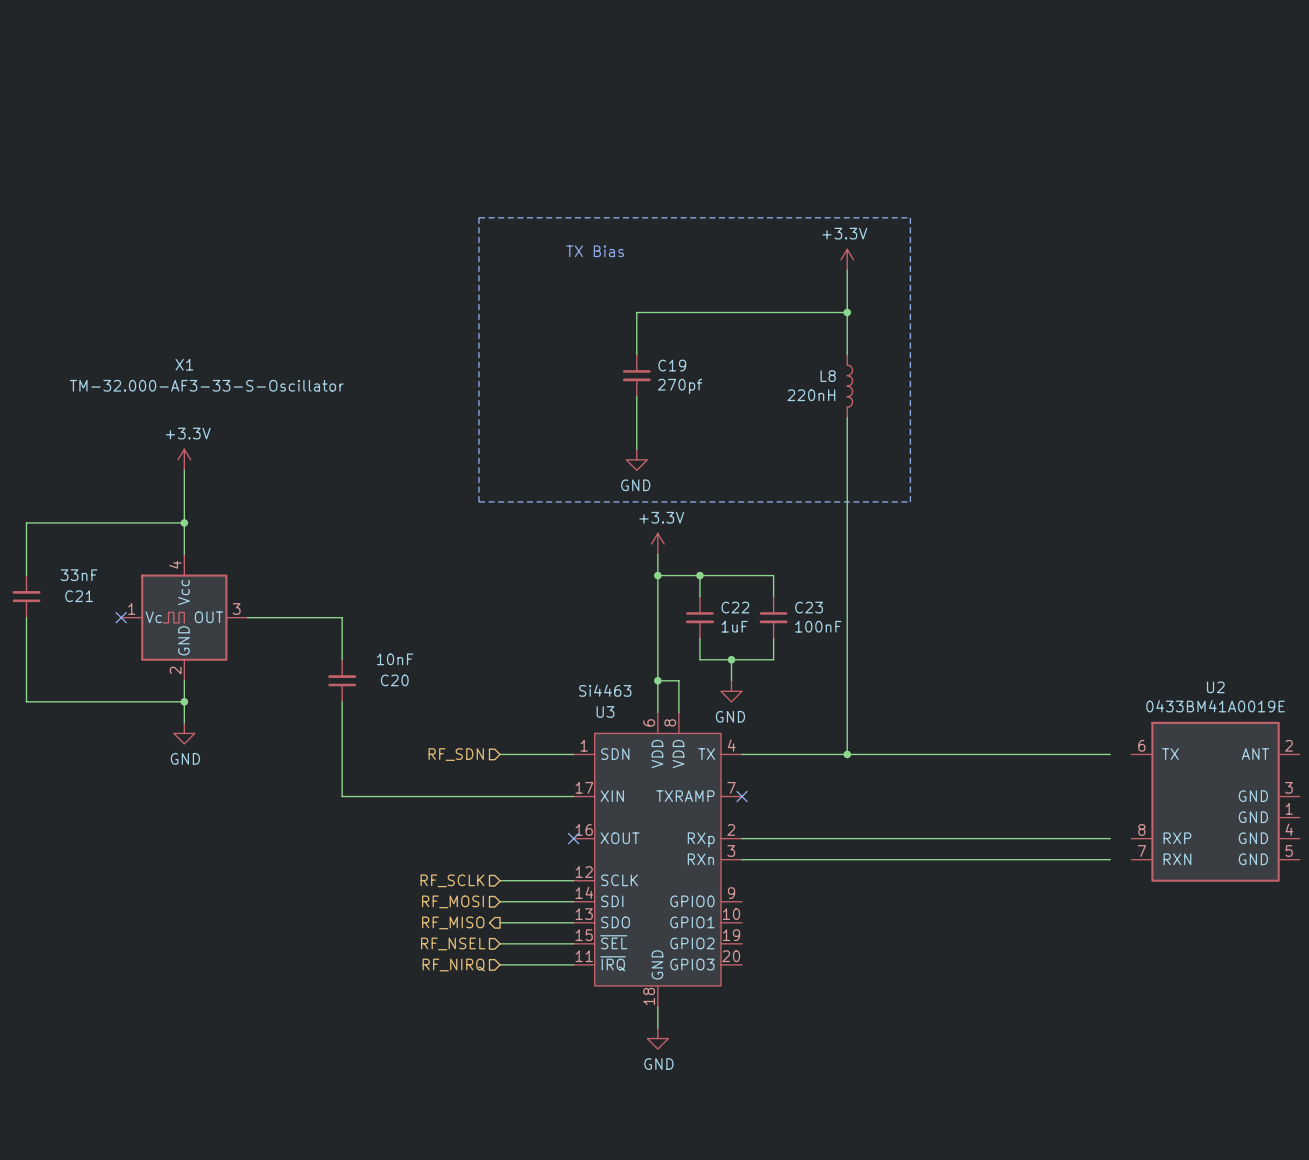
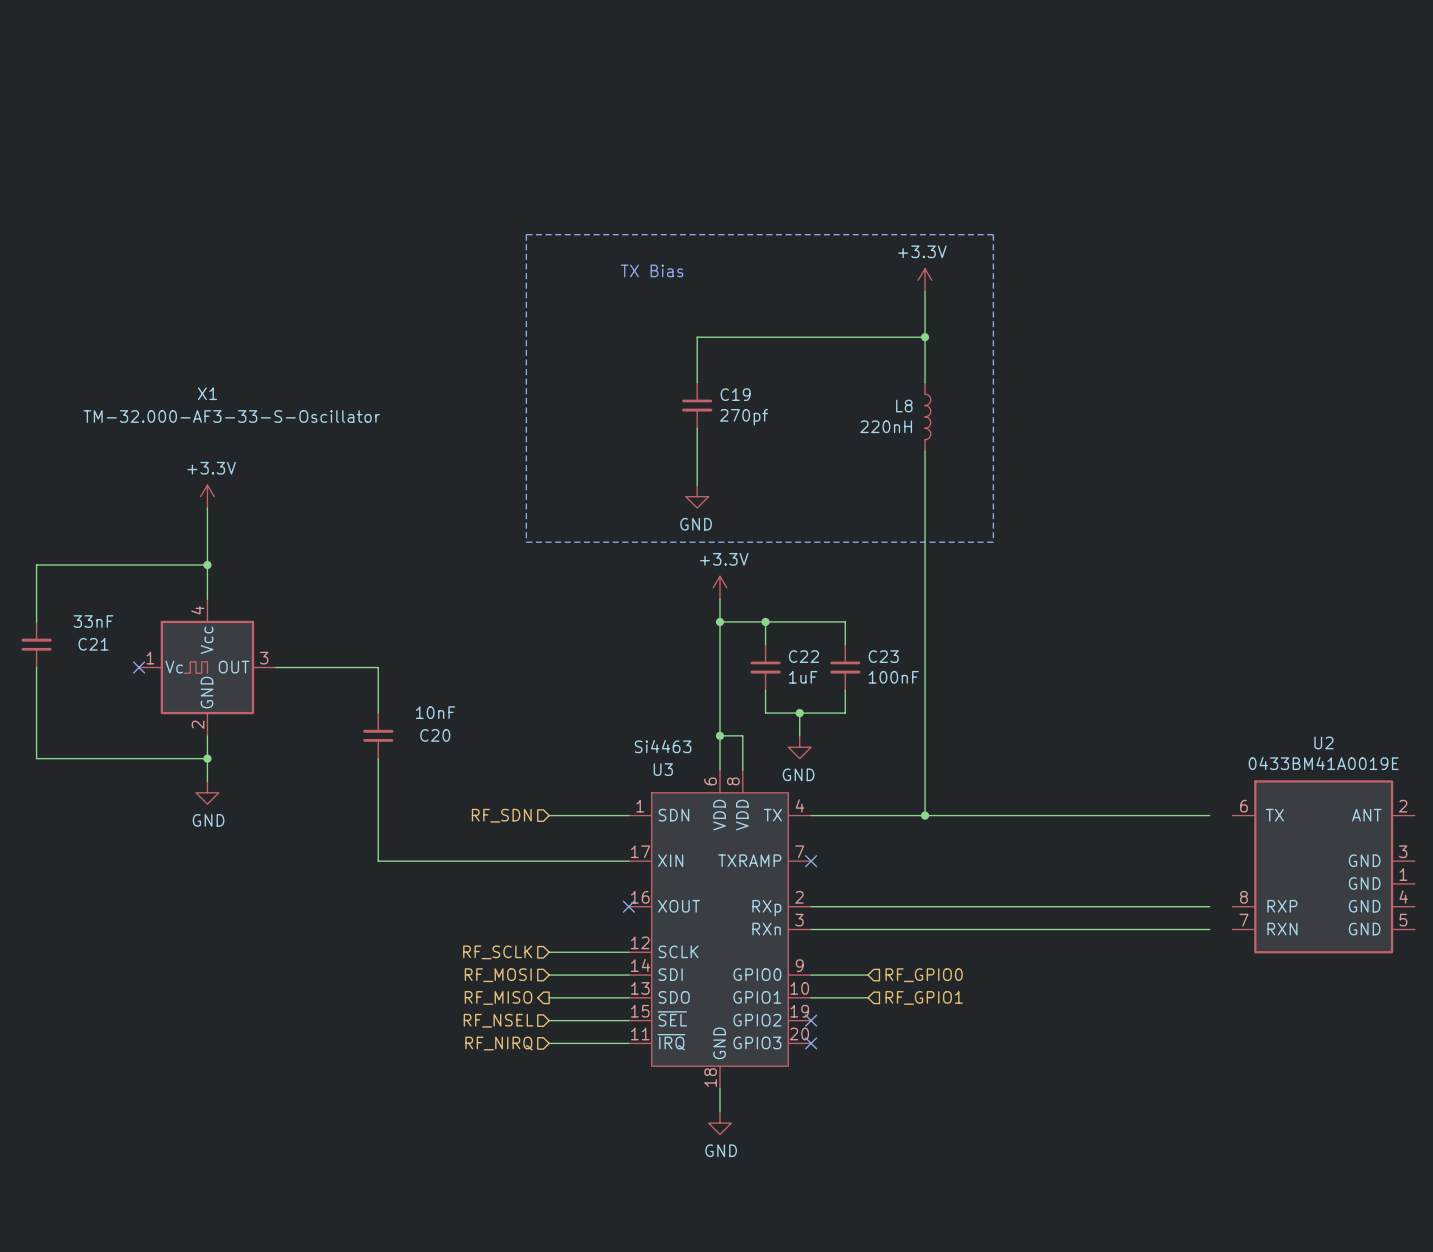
wire: none -> (811, 975) (868, 975)
hierarchical label: none -> RF_GPIO0 (924, 975)
wire: none -> (811, 997) (868, 997)
hierarchical label: none -> RF_GPIO1 (924, 997)
no-connect mark: none -> (811, 1020)
no-connect mark: none -> (811, 1043)

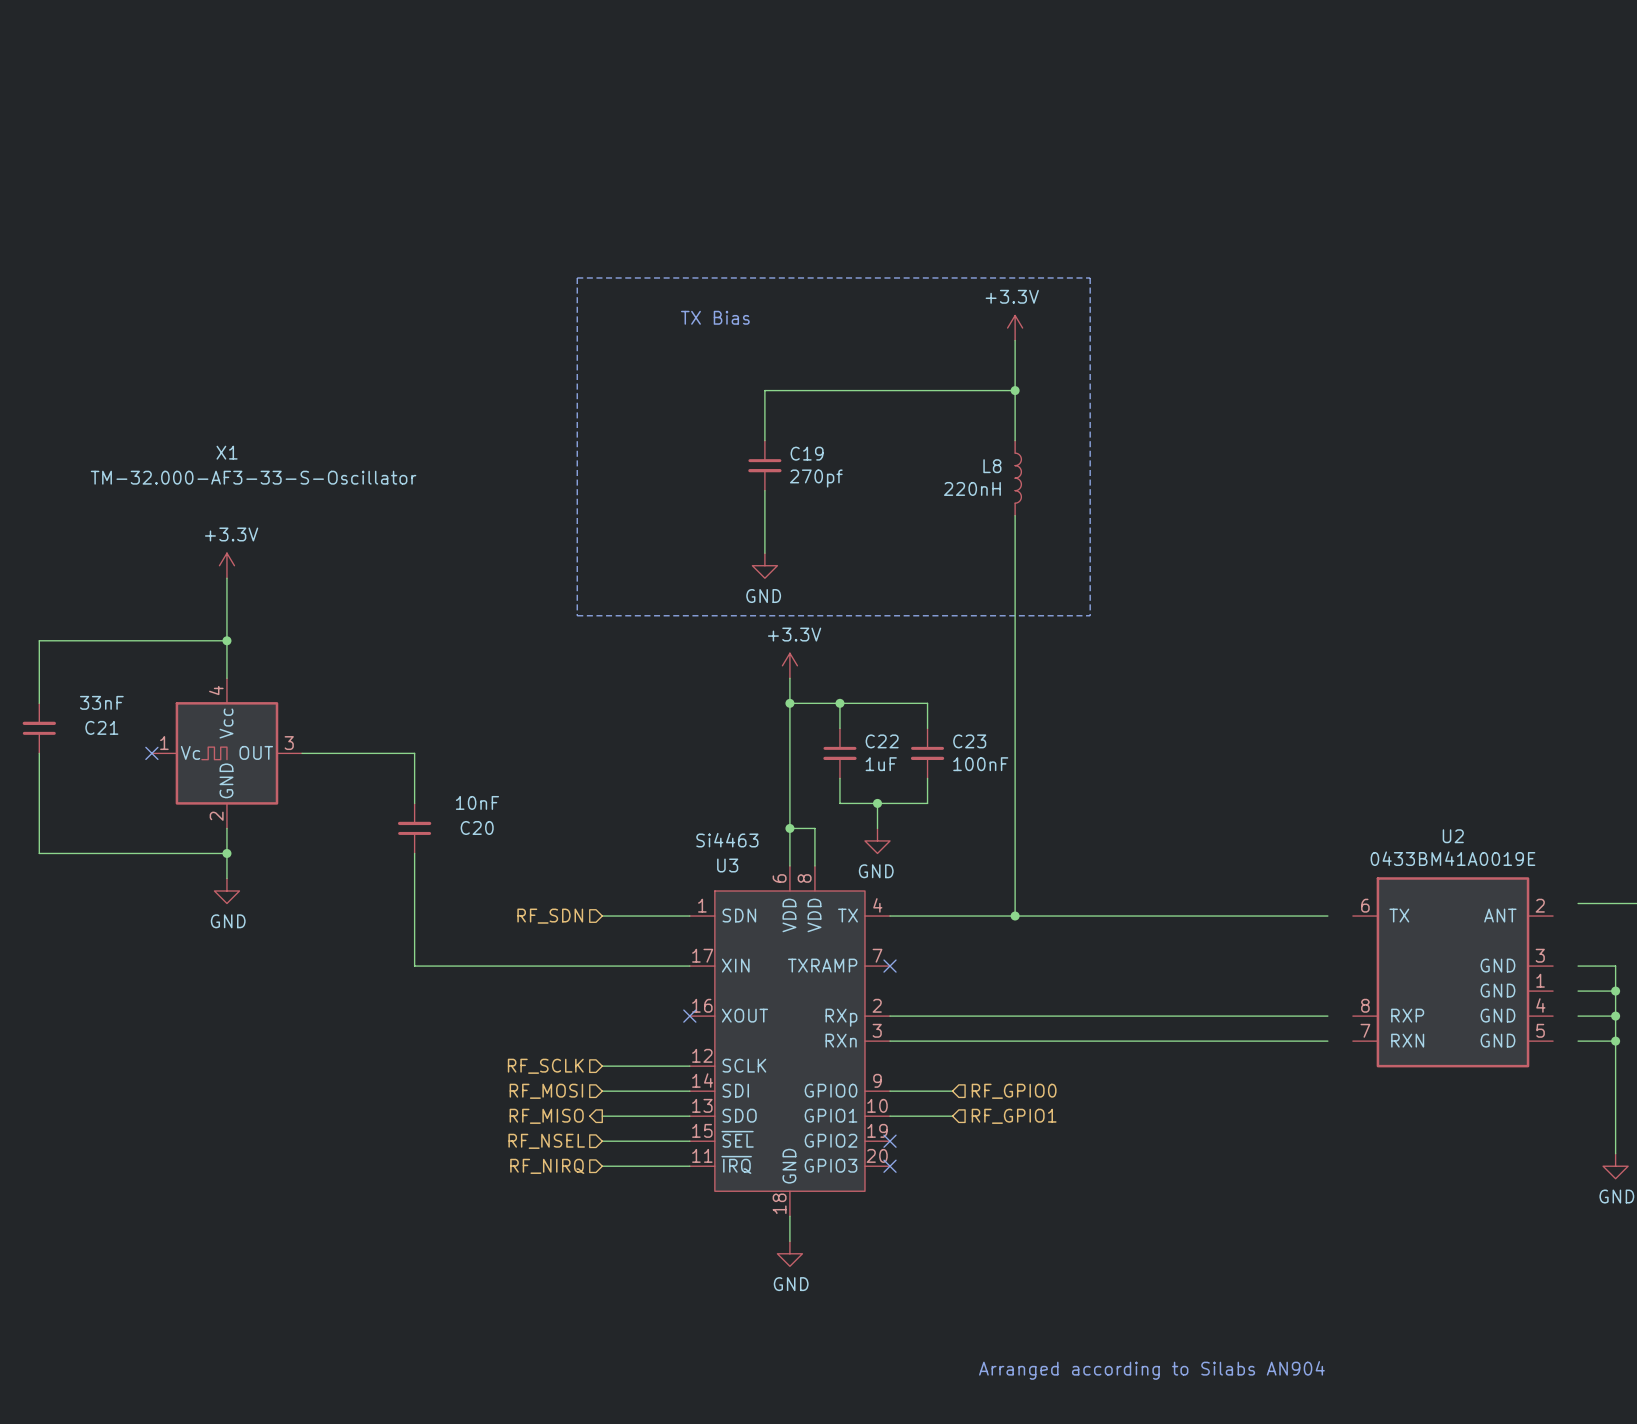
text: none -> Arranged according to Silabs AN904 (1151, 1370)

